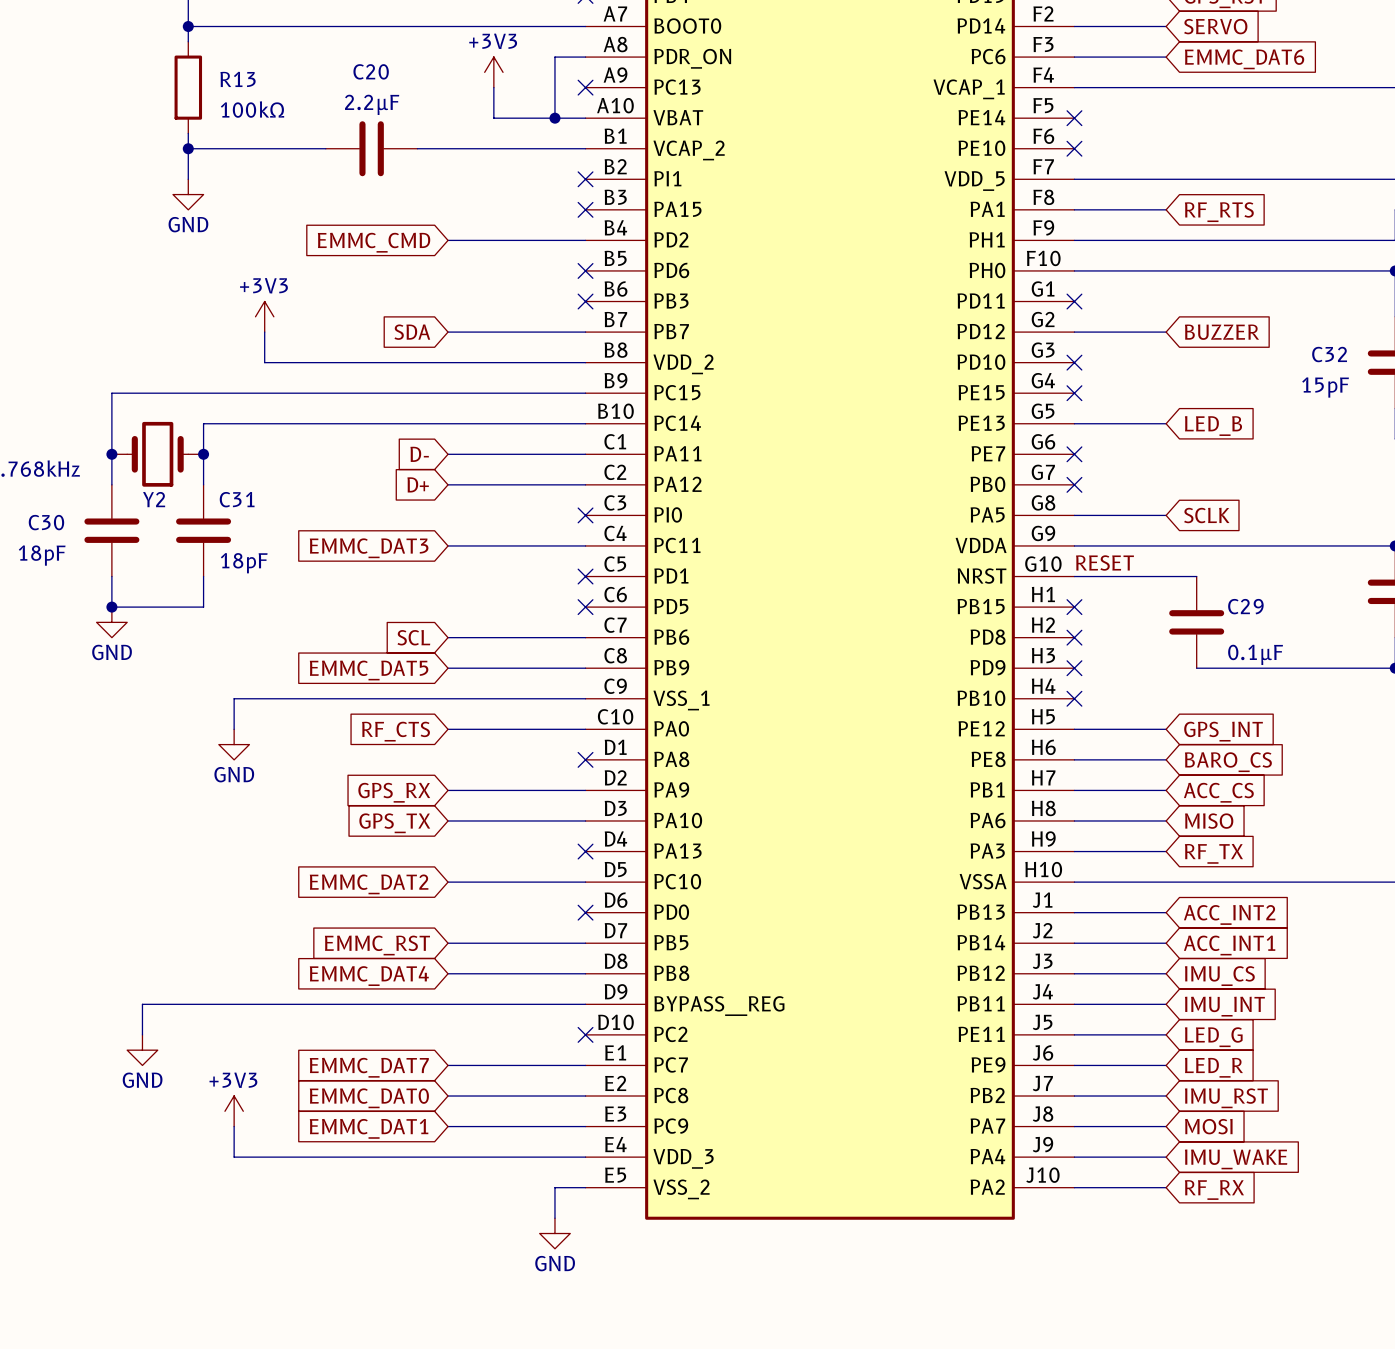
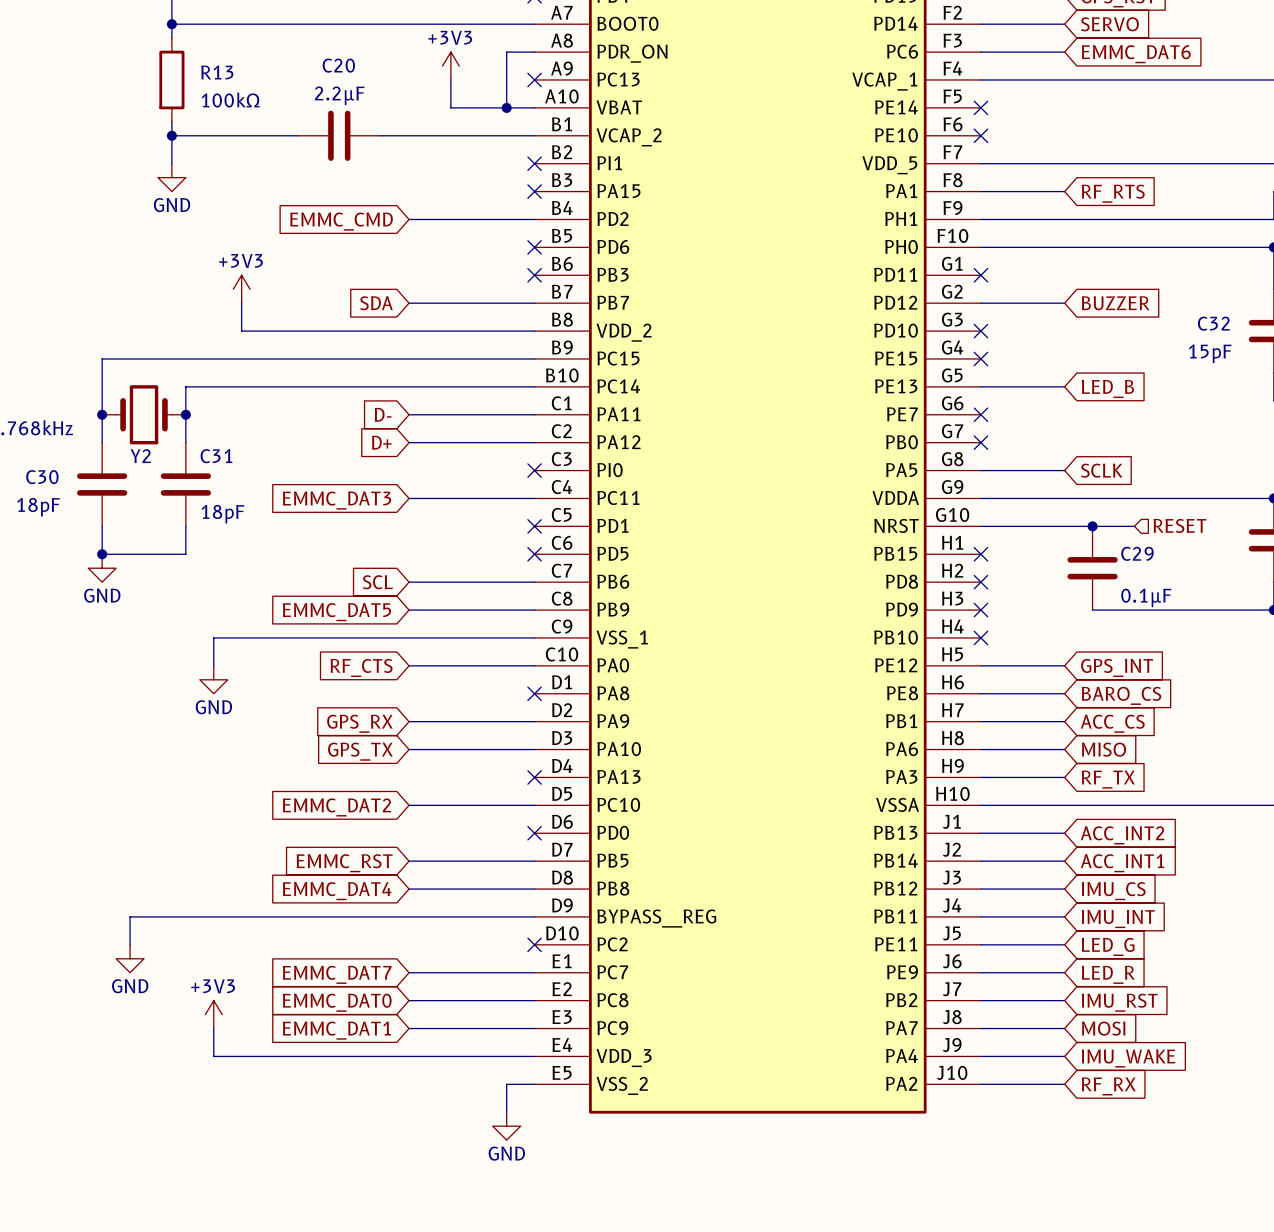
label: RESET (1104, 563) -> none
wire: none -> (1092, 526) (1134, 526)
junction: none -> (1092, 526)
hierarchical label: none -> RESET (1179, 525)

